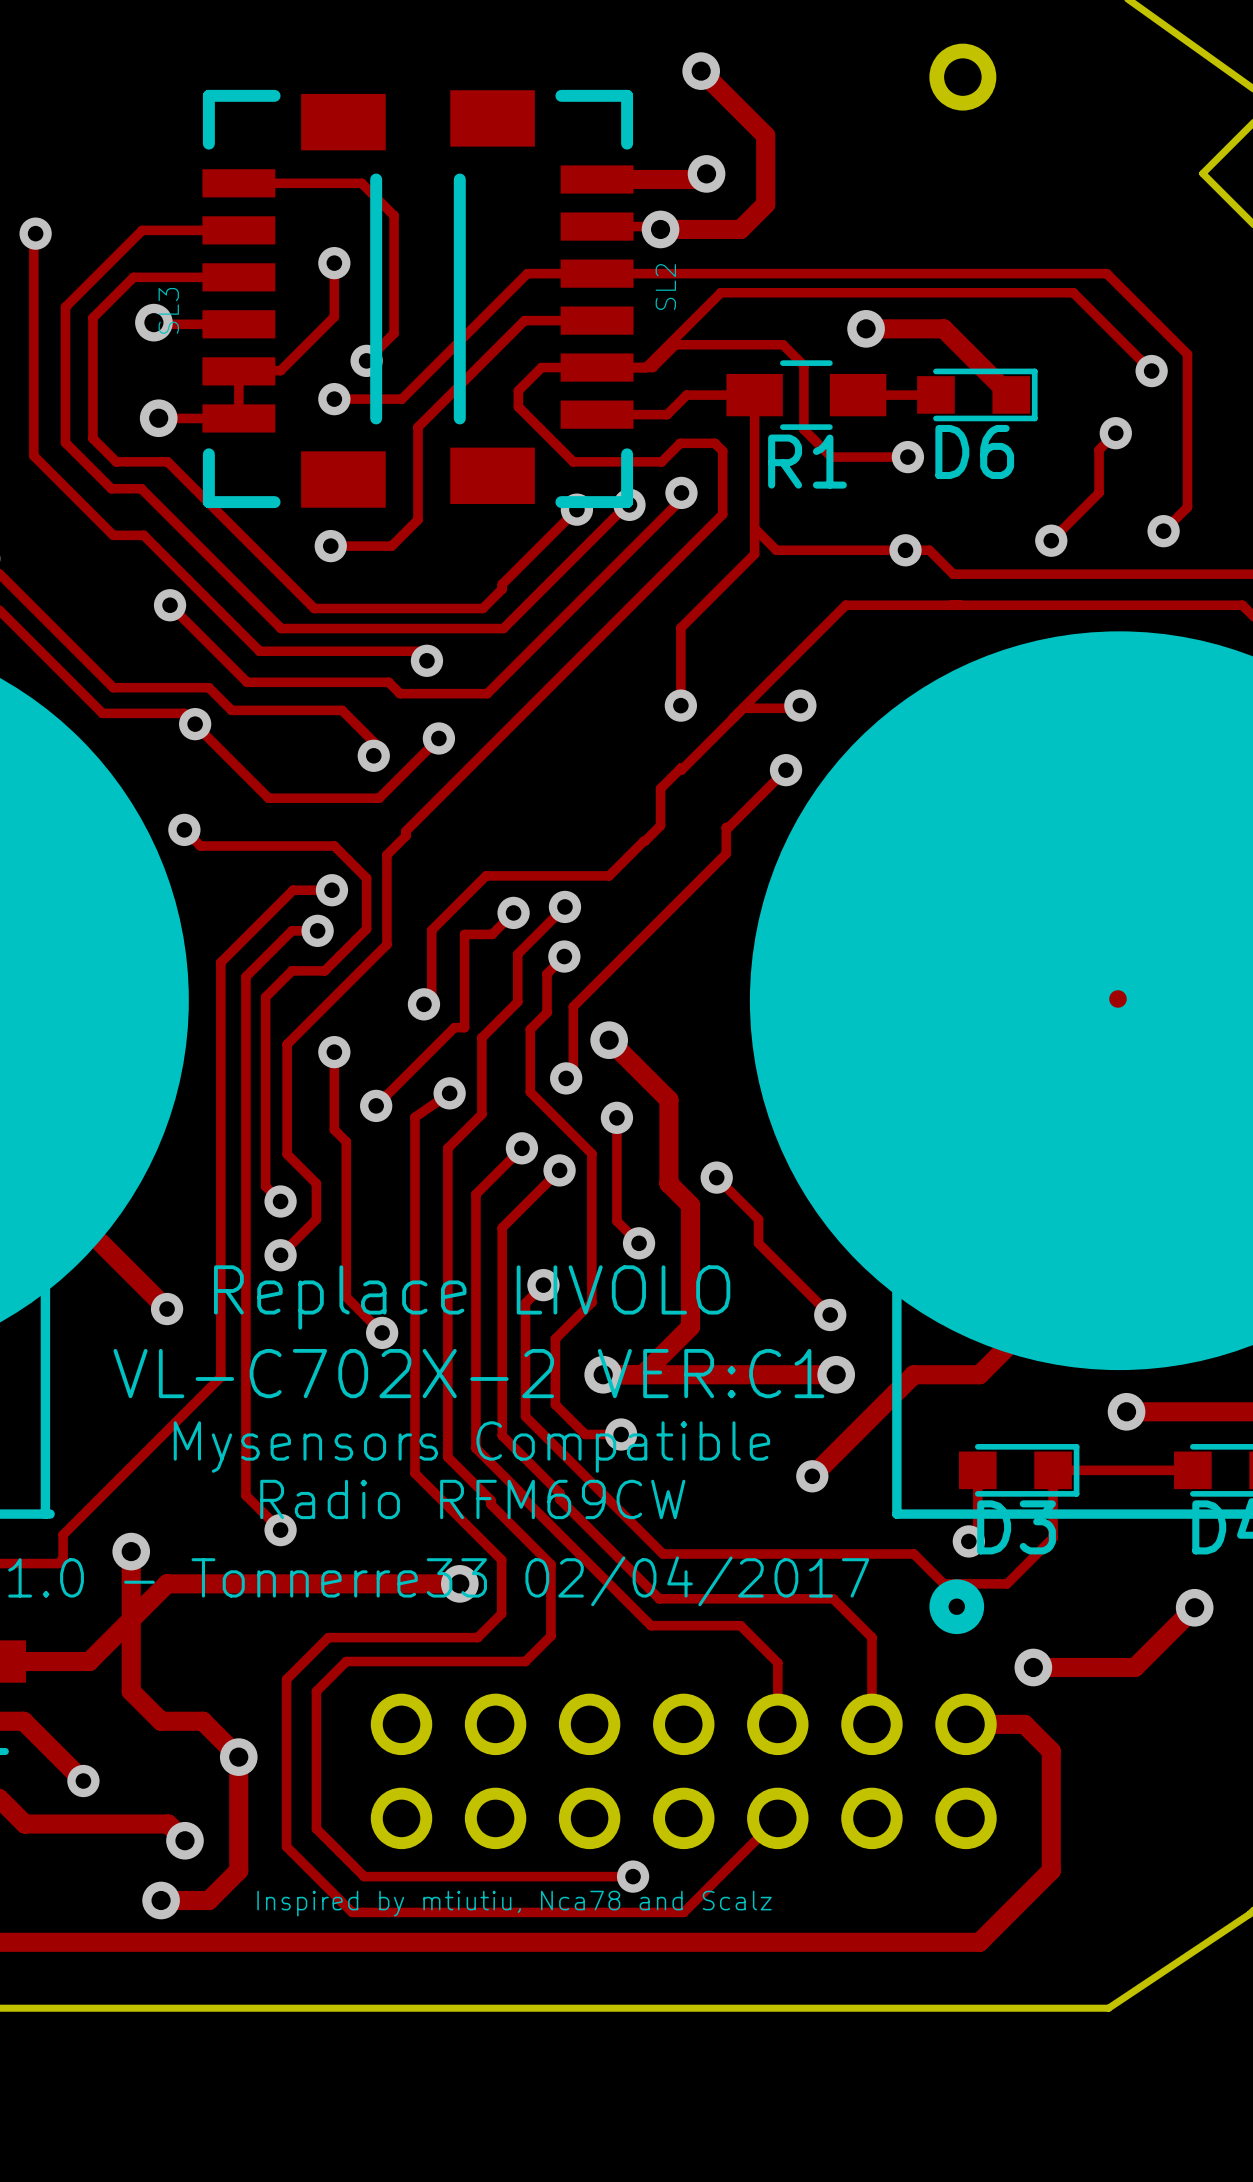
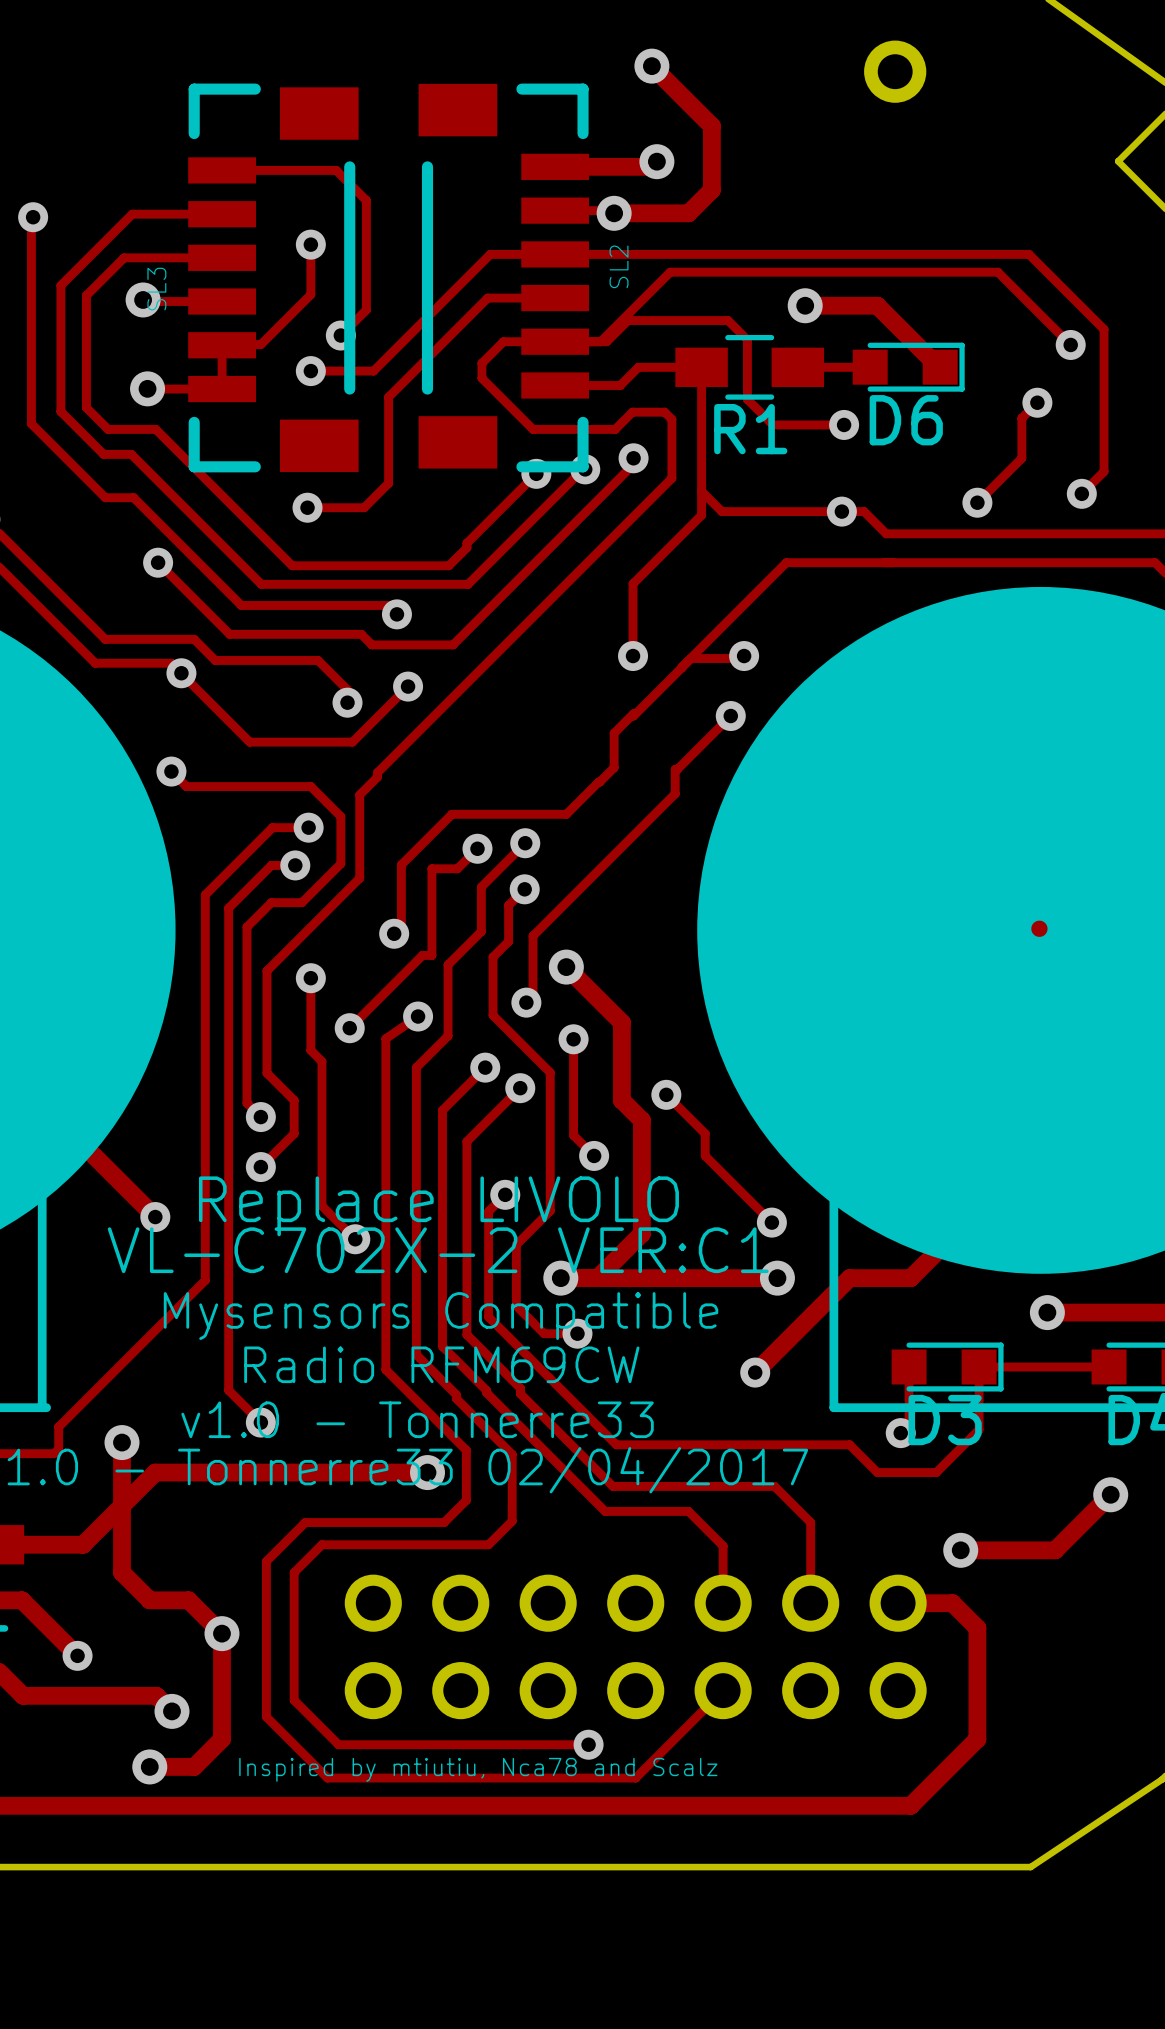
text position: VL-C702X-2 VER:C1 (468, 1373) -> VL-C702X-2 VER:C1 (438, 1250)
text position: Mysensors Compatible (471, 1447) -> Mysensors Compatible (441, 1316)
text position: Radio RFM69CW (472, 1499) -> Radio RFM69CW (441, 1364)
text: none -> v1.0 - Tonnerre33 (417, 1419)
drawing: [929, 1579, 985, 1635] -> none

